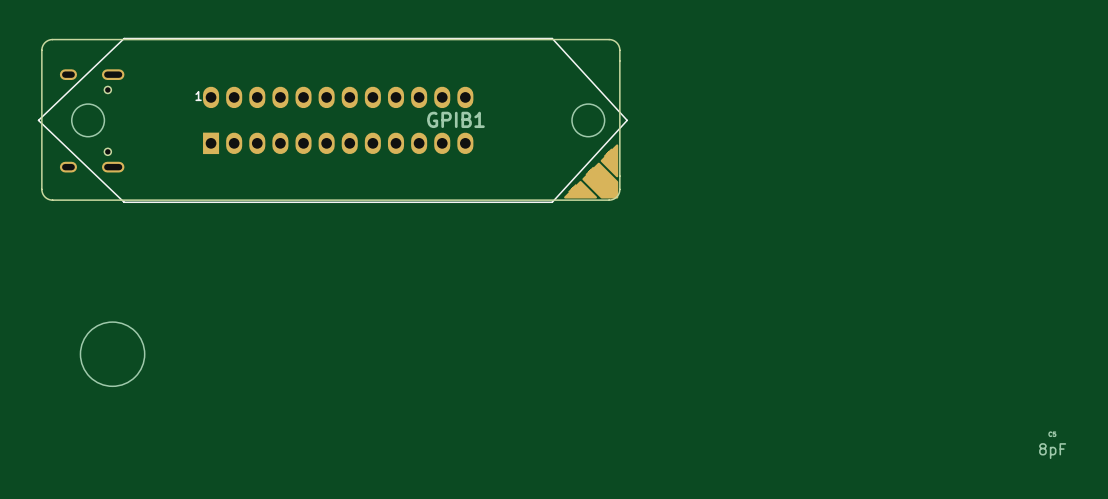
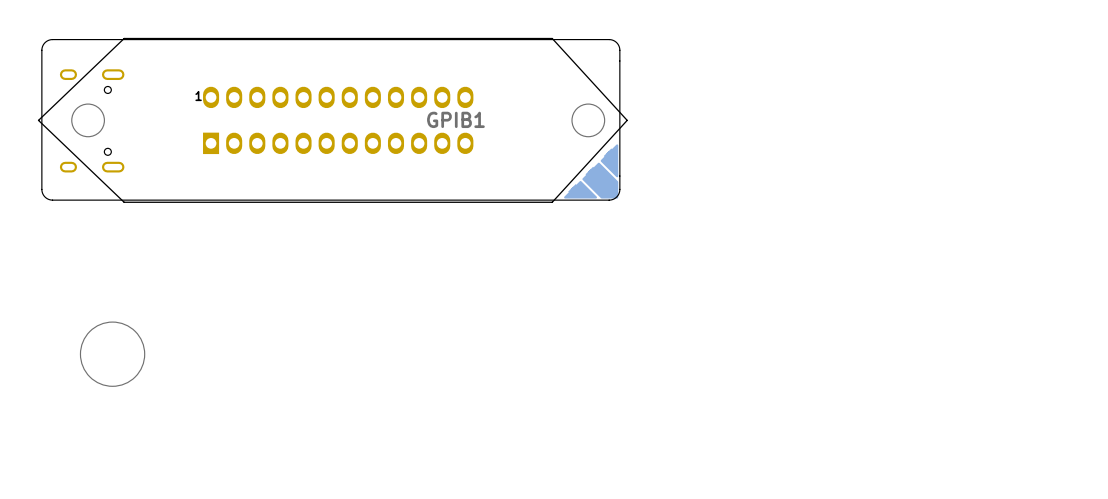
part: 8pF (1052, 445) -> none

